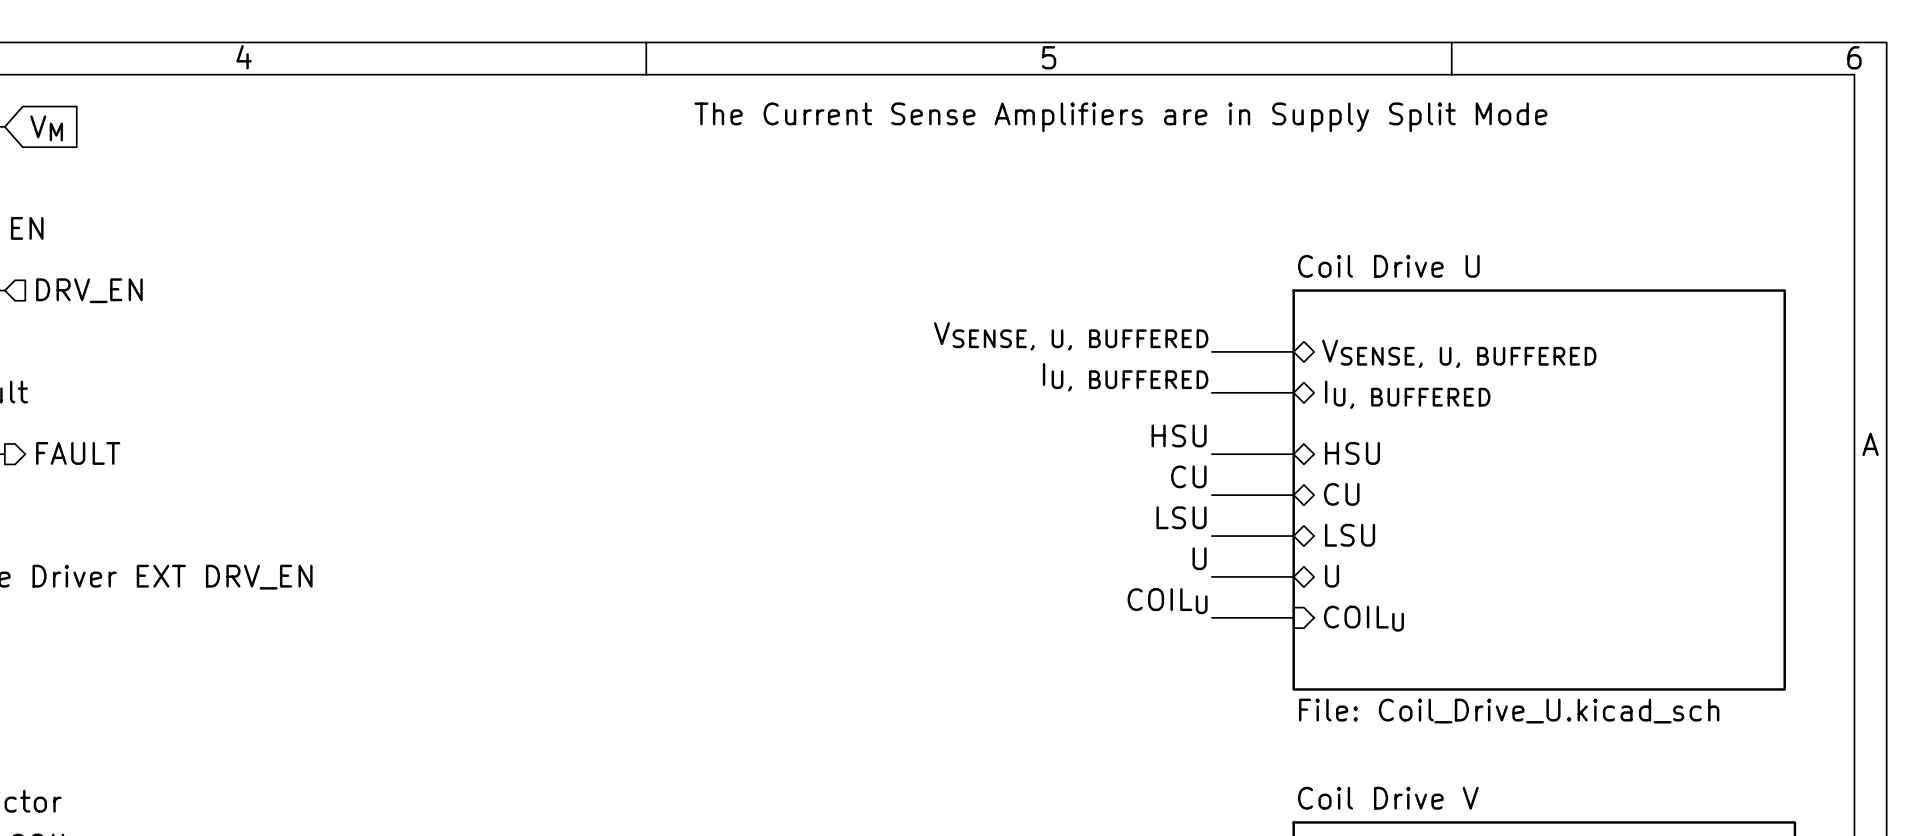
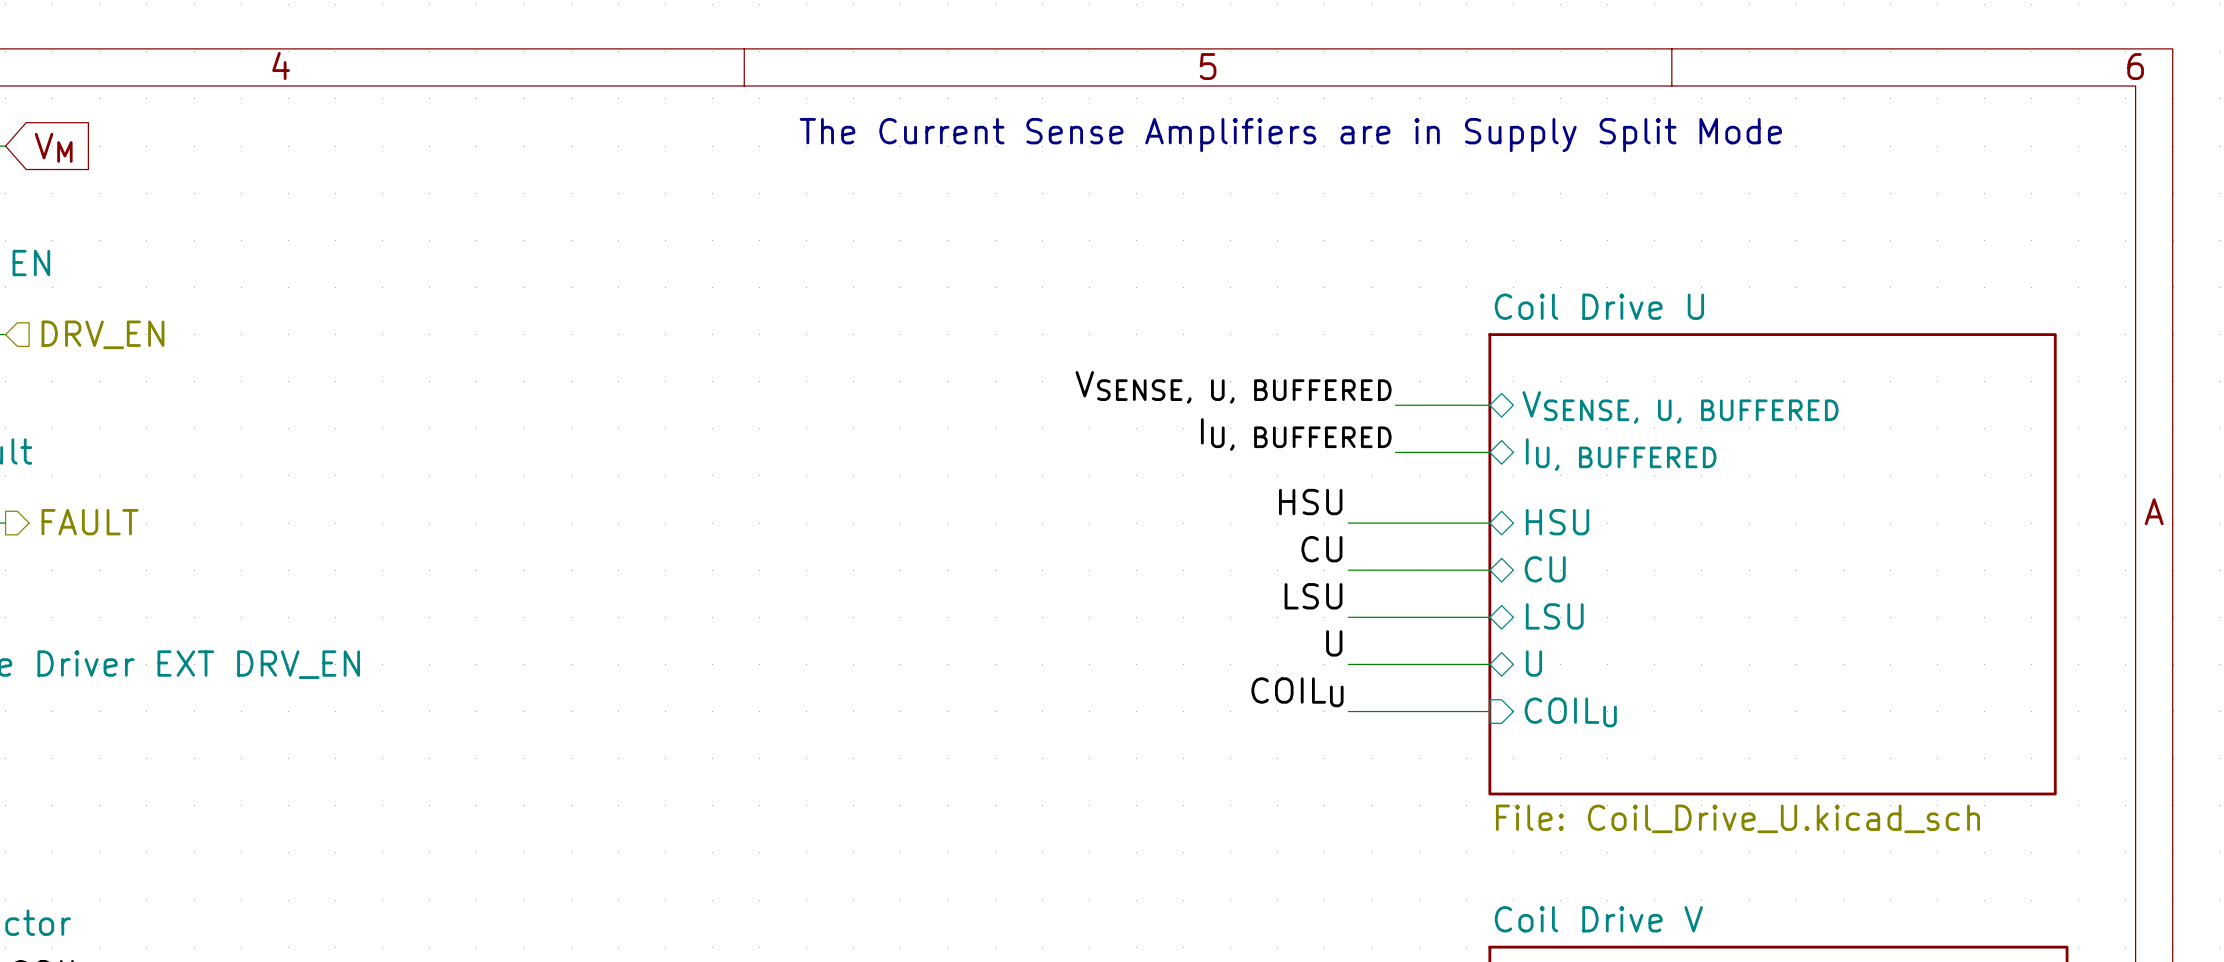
label position: HSU (1179, 435) -> HSU (1310, 502)
wire: none -> (1348, 523) (1395, 523)
label position: CU (1188, 476) -> CU (1321, 549)
wire: none -> (1348, 570) (1395, 570)
label position: LSU (1181, 517) -> LSU (1313, 596)
wire: none -> (1348, 617) (1395, 617)
label position: U (1199, 558) -> U (1334, 643)
wire: none -> (1348, 664) (1395, 664)
label position: COILU (1167, 601) -> COILU (1297, 692)
wire: none -> (1348, 711) (1395, 711)

